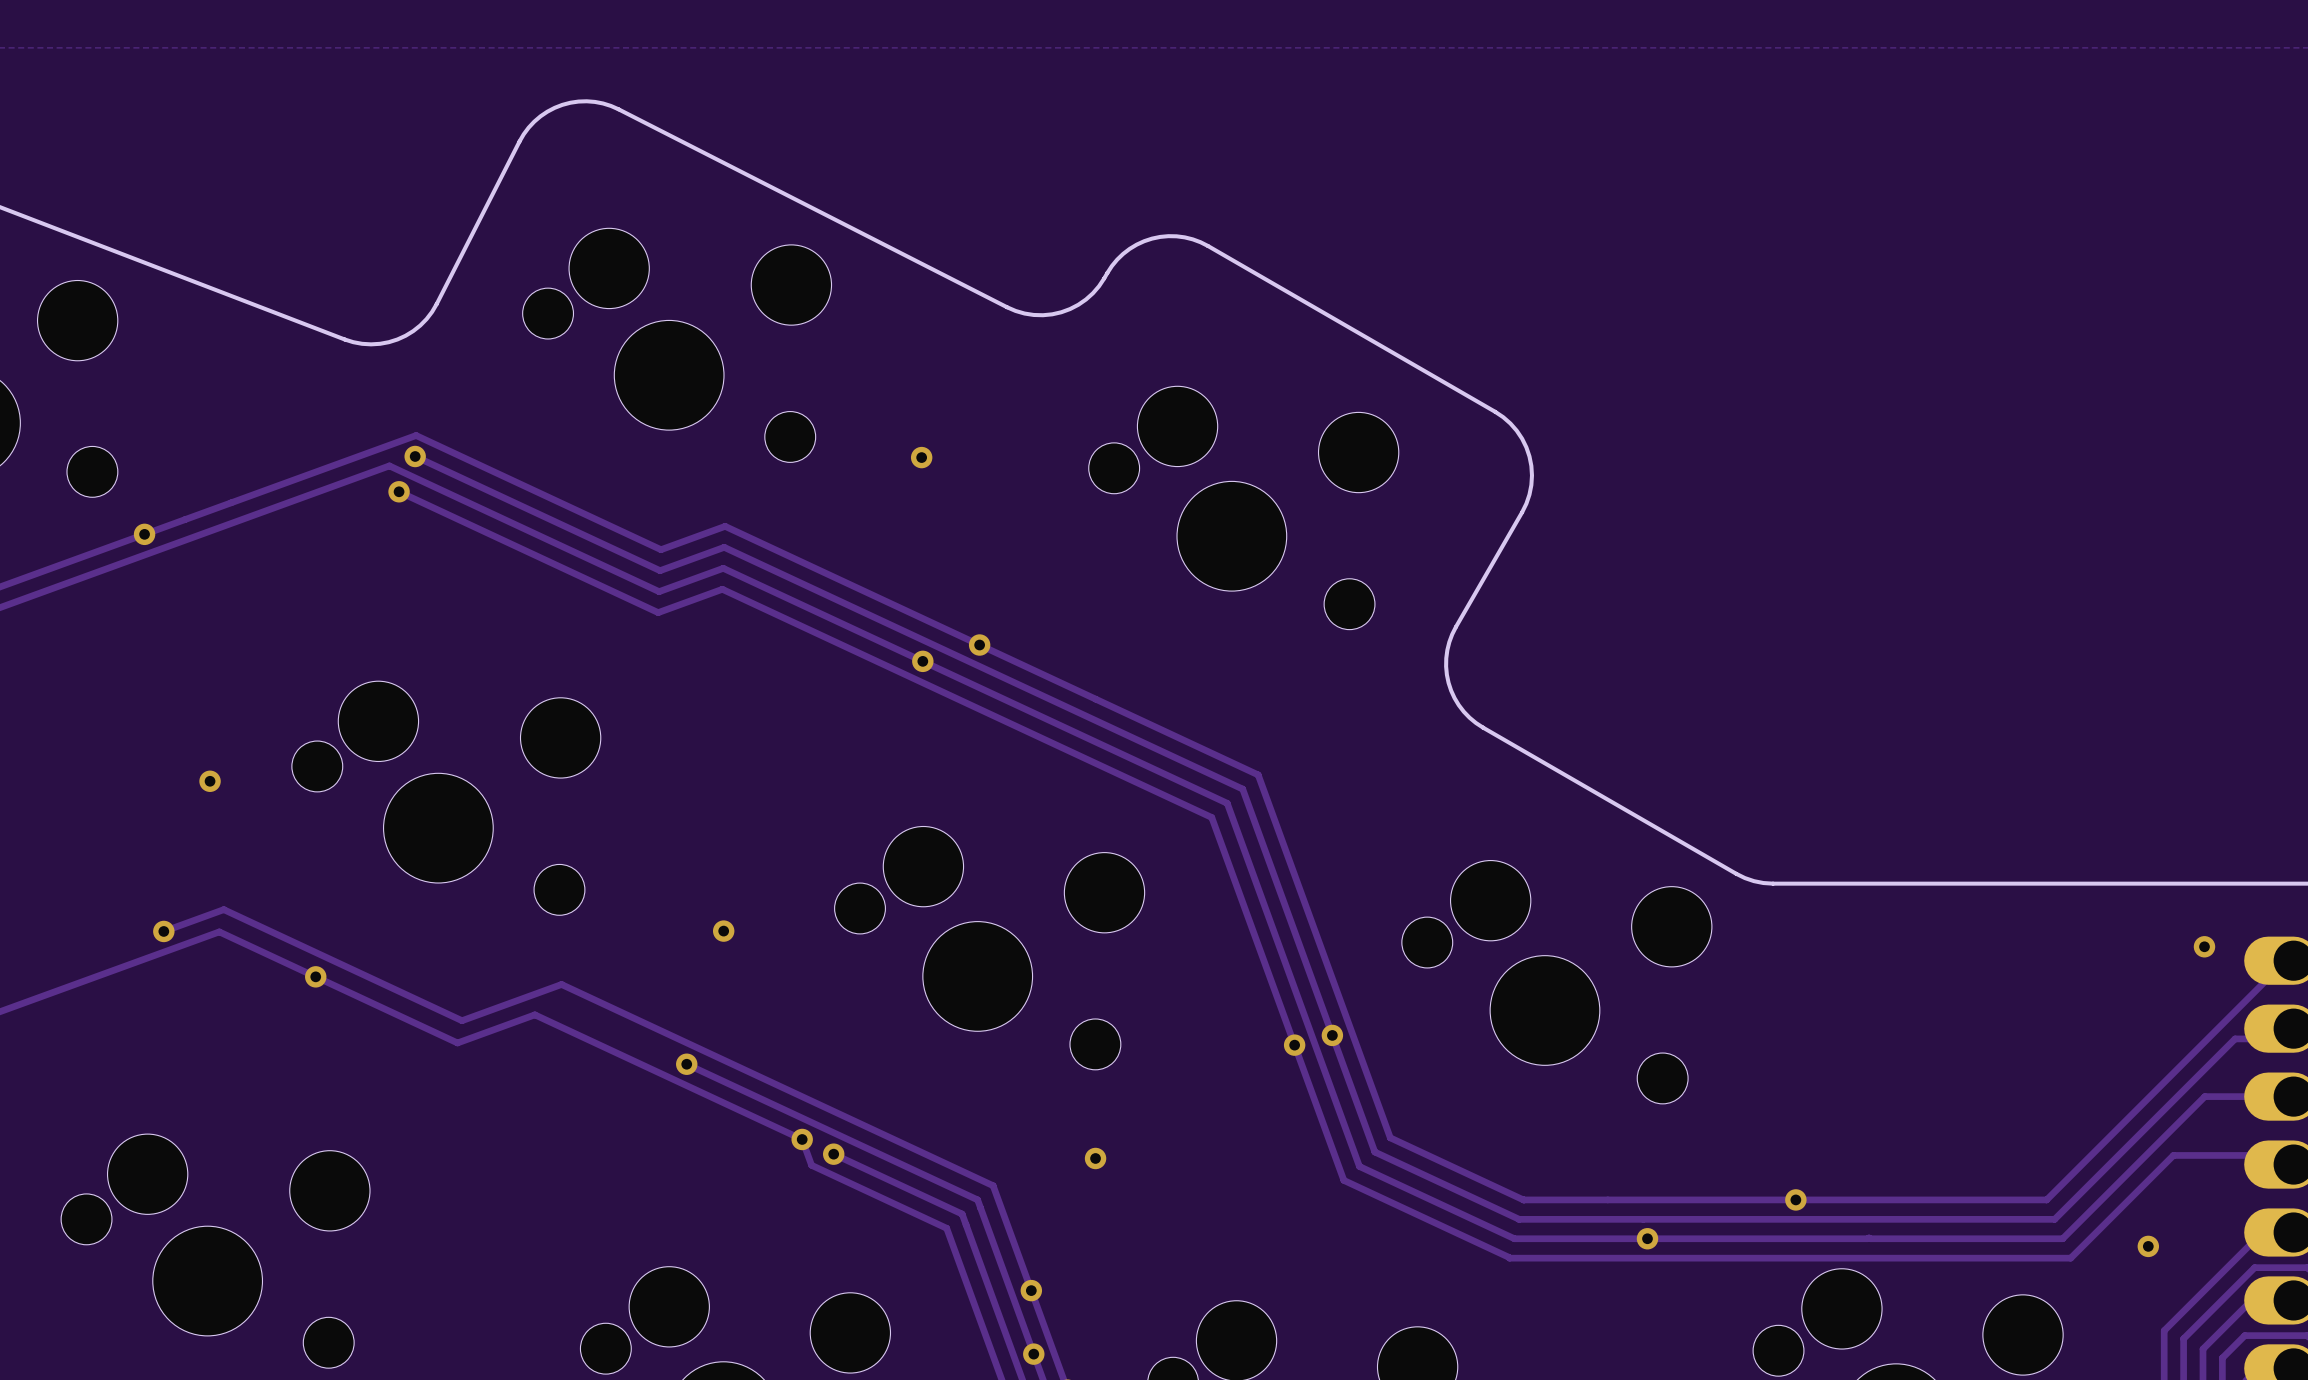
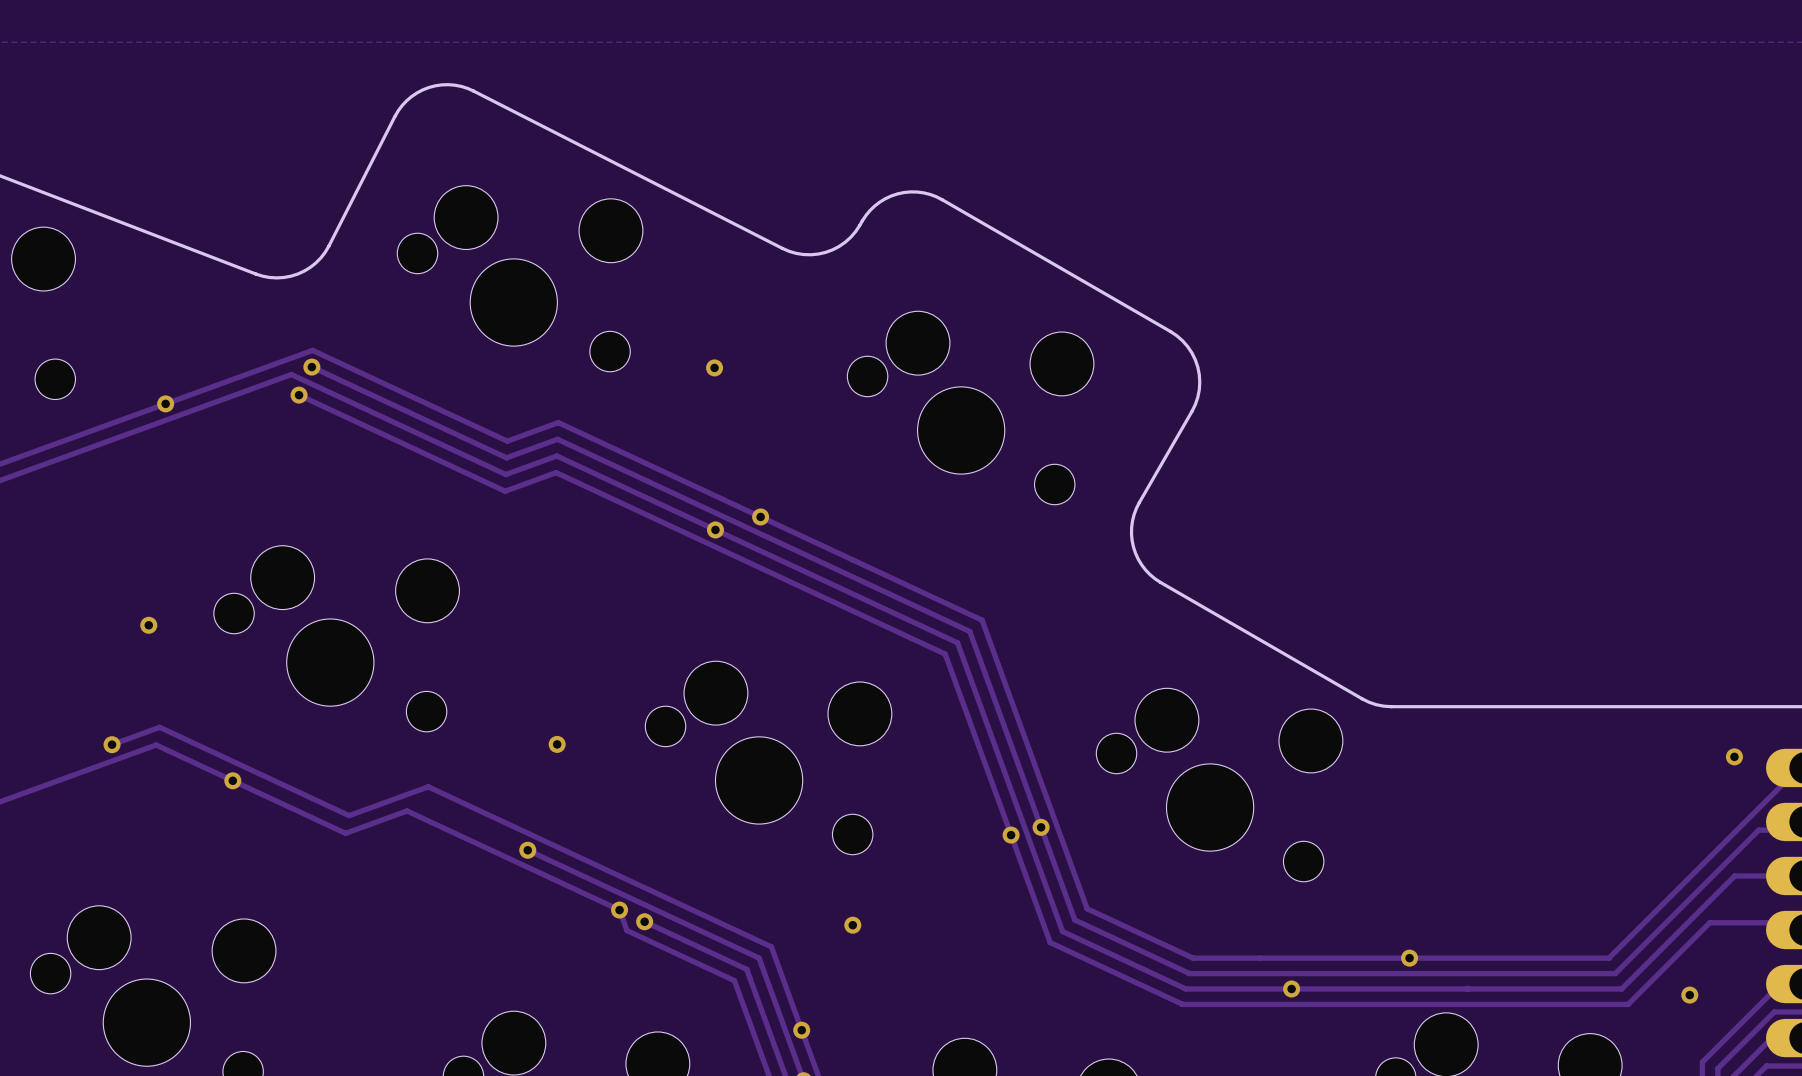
via position: (144, 534) -> (165, 403)

